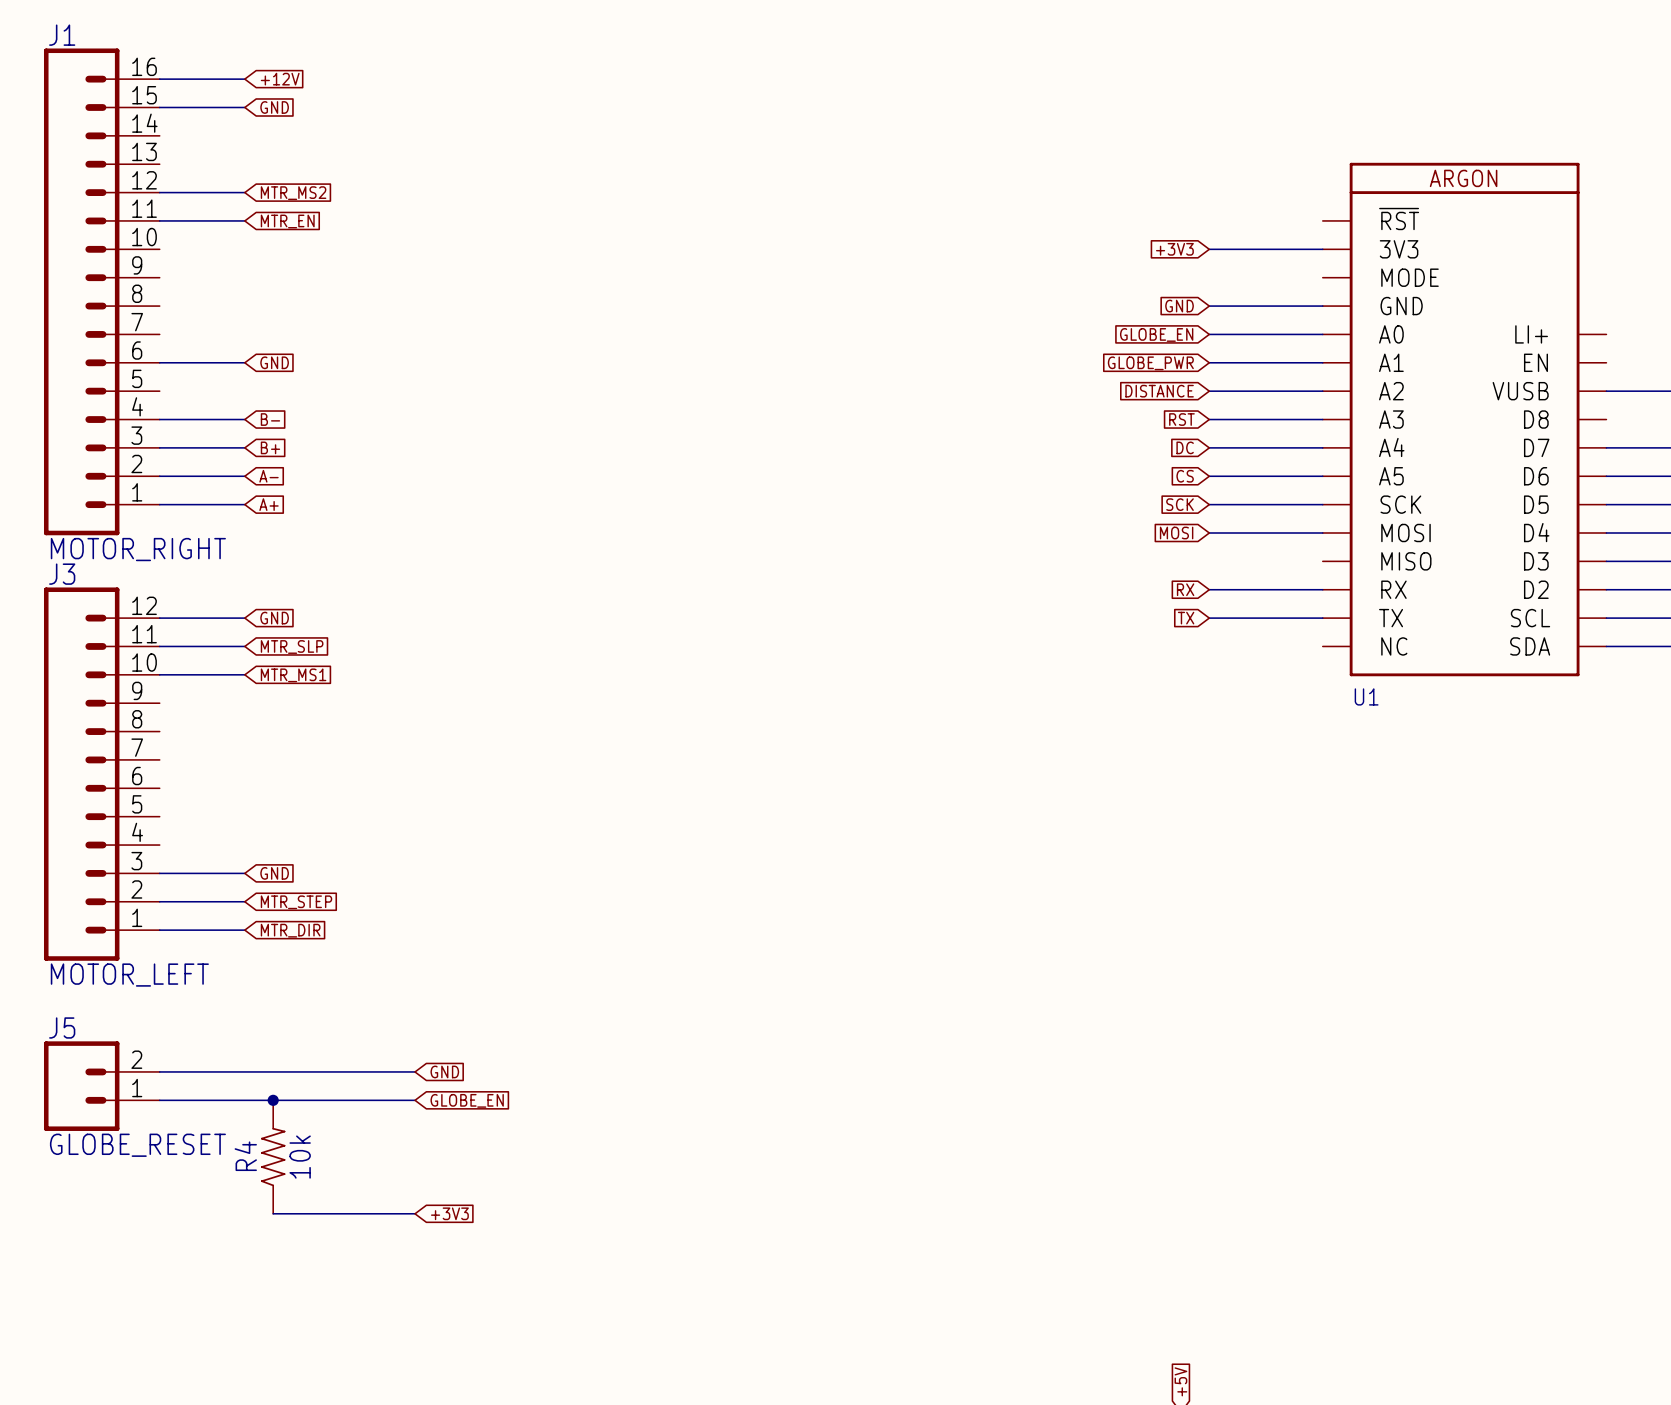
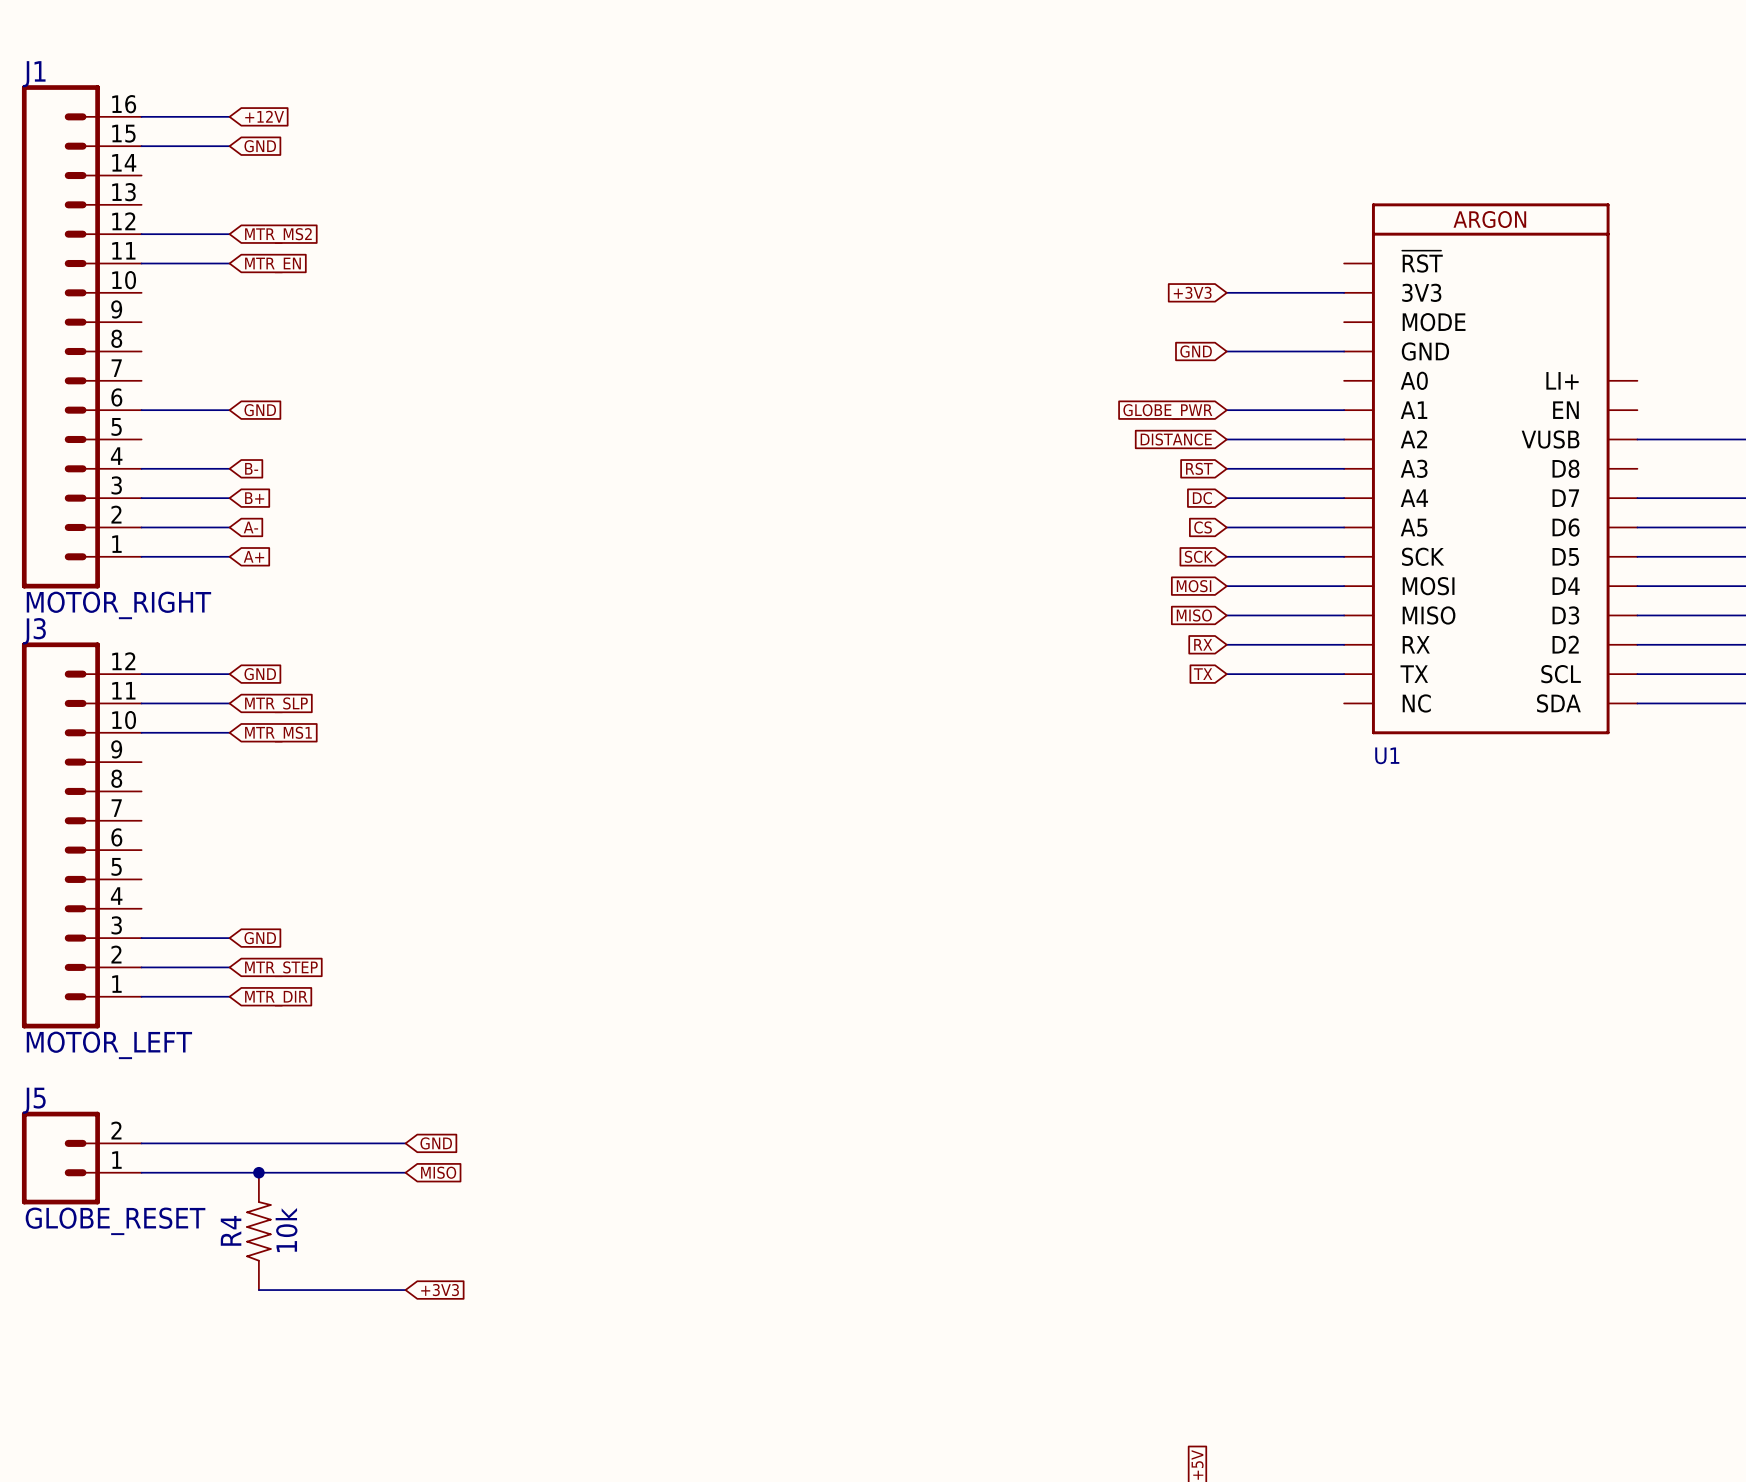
global label: GLOBE_EN (1156, 334) -> none
wire: (1209, 334) (1322, 334) -> (1226, 615) (1344, 615)
global label: none -> MISO (1194, 615)
global label: GLOBE_EN (467, 1100) -> MISO (438, 1172)

